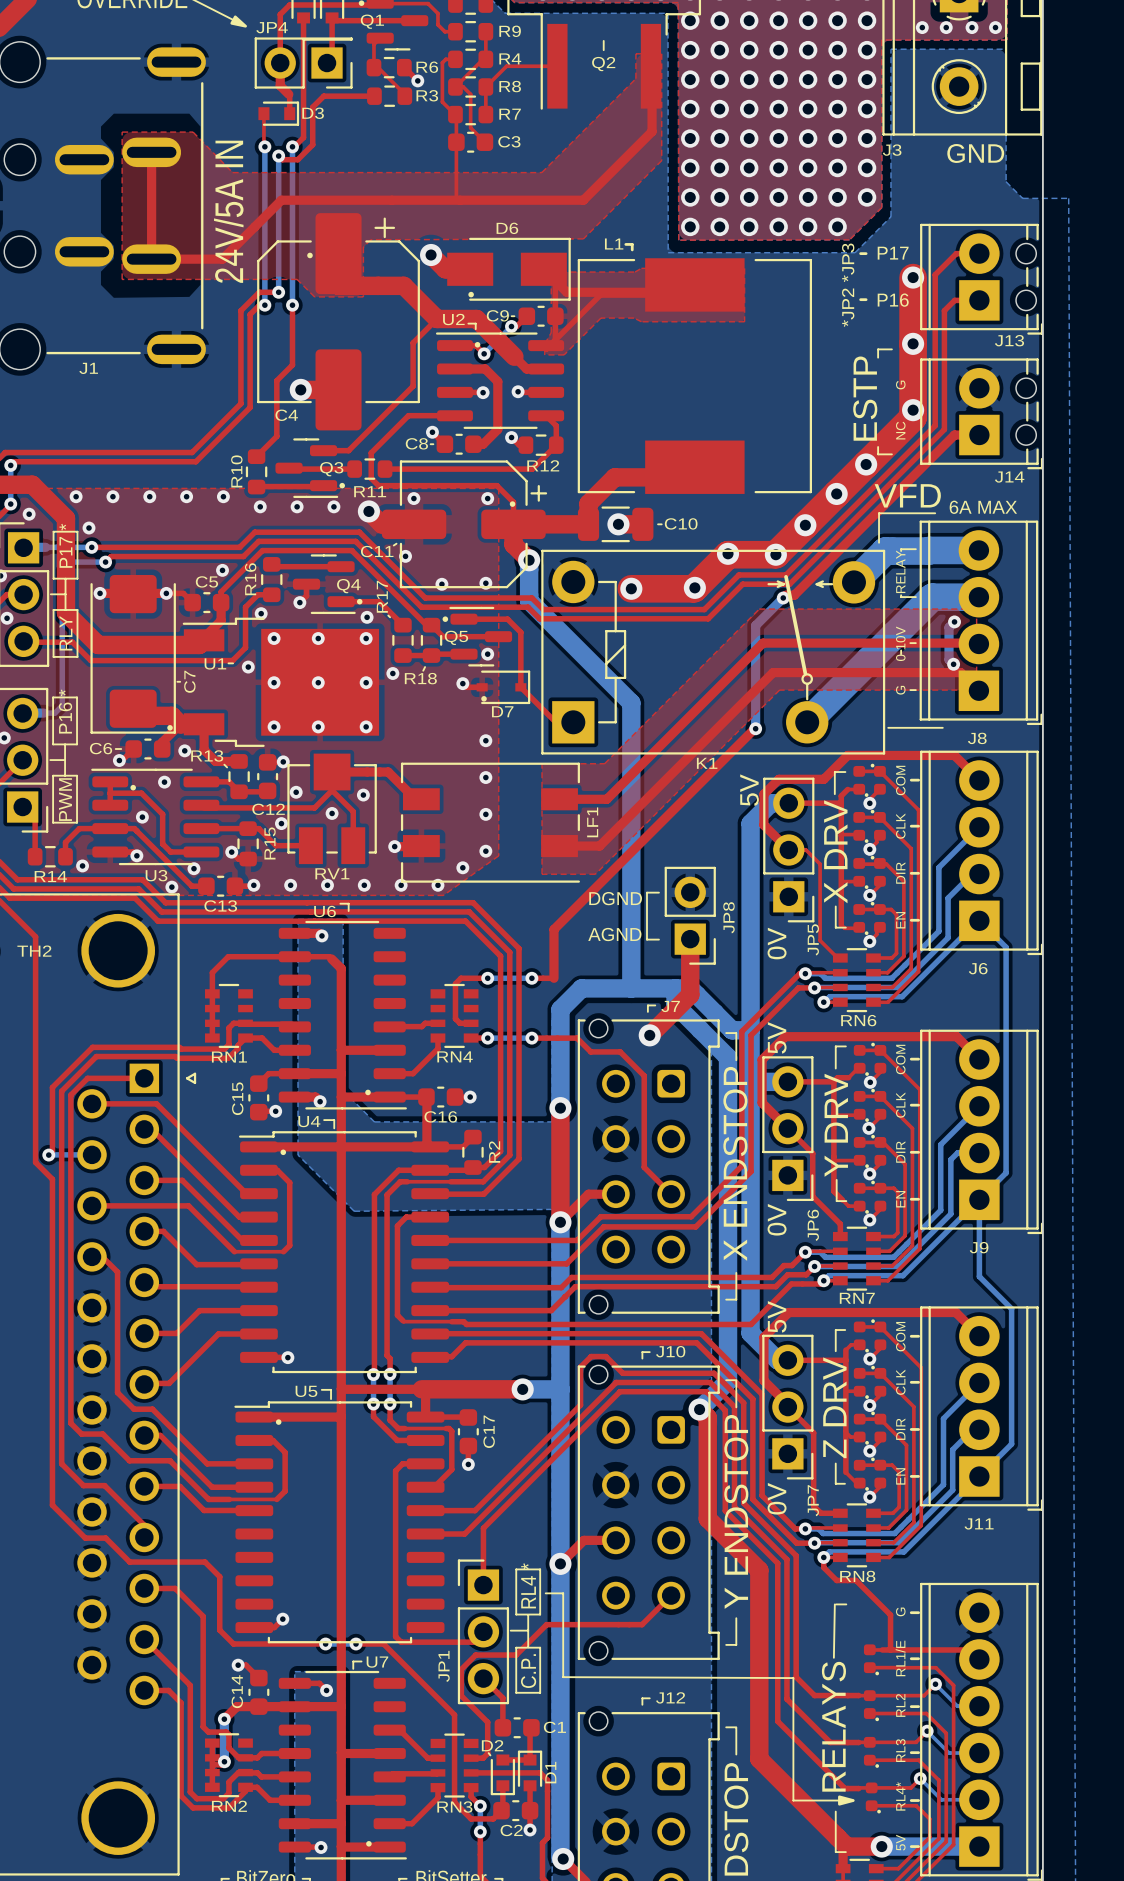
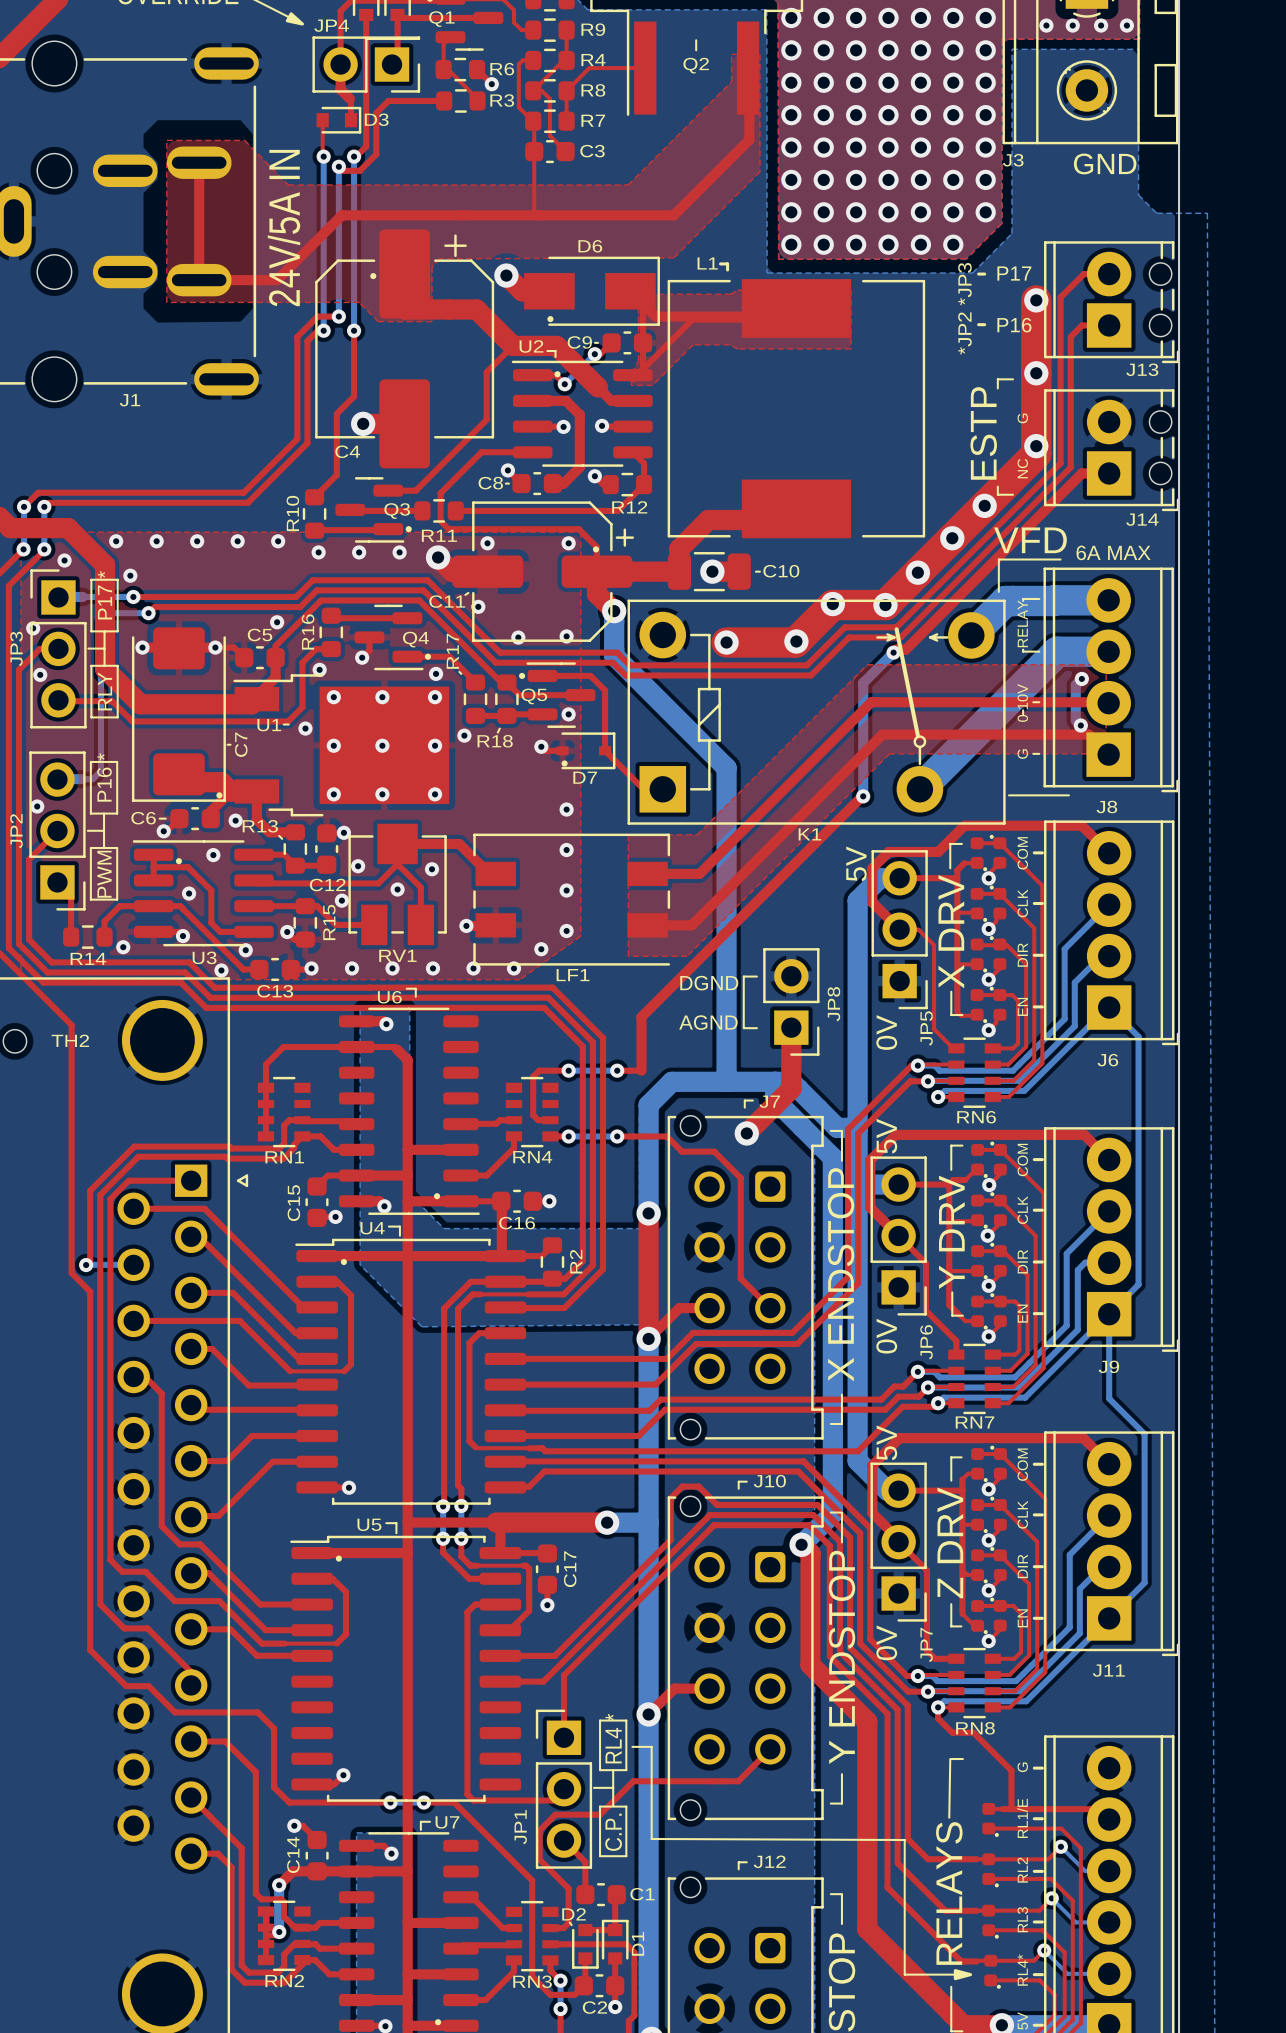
LF1 name rotation: 0° (592, 822) -> 90° clockwise (573, 975)
LF1 name position: LF1 (592, 822) -> LF1 (573, 975)

